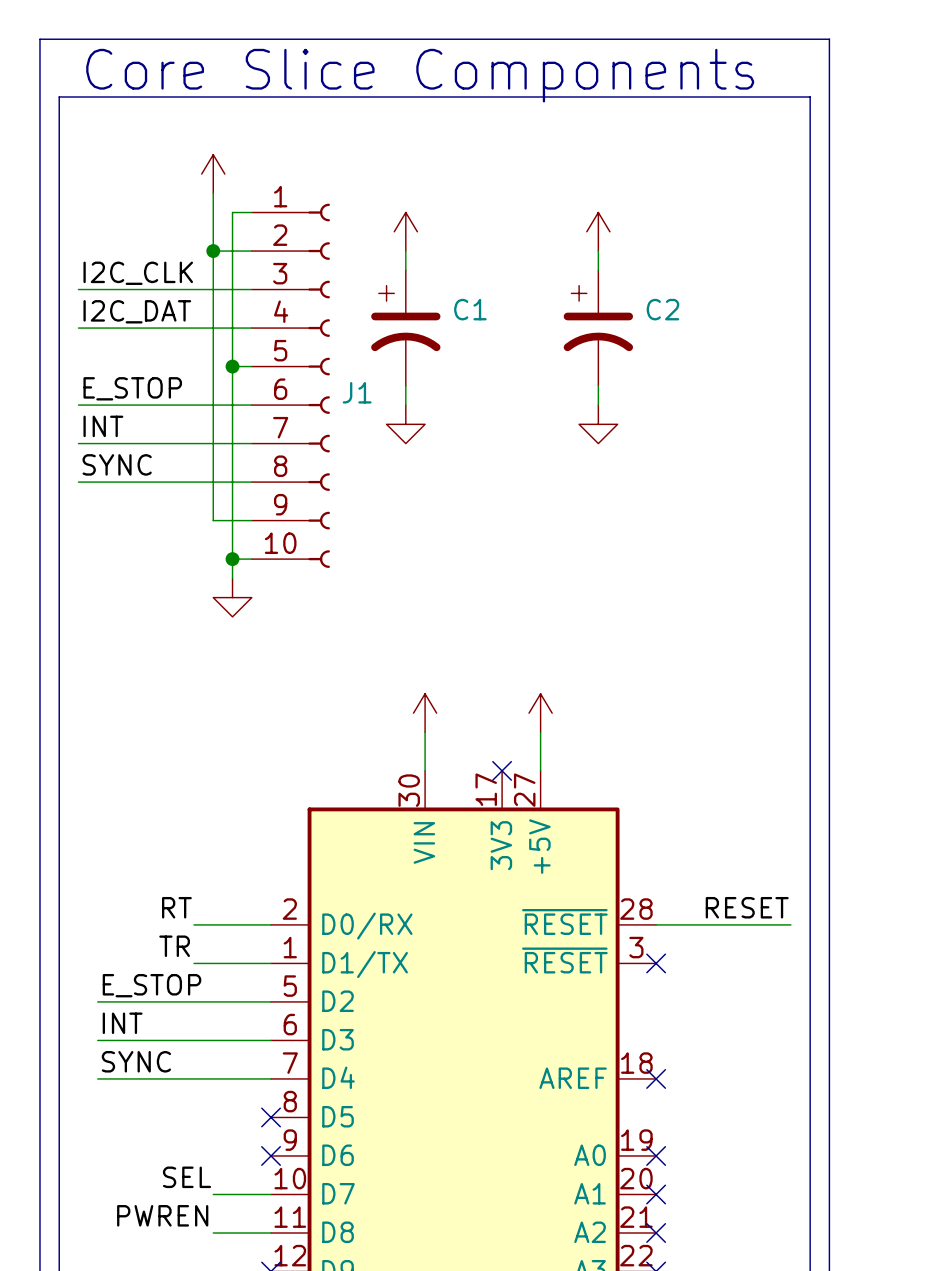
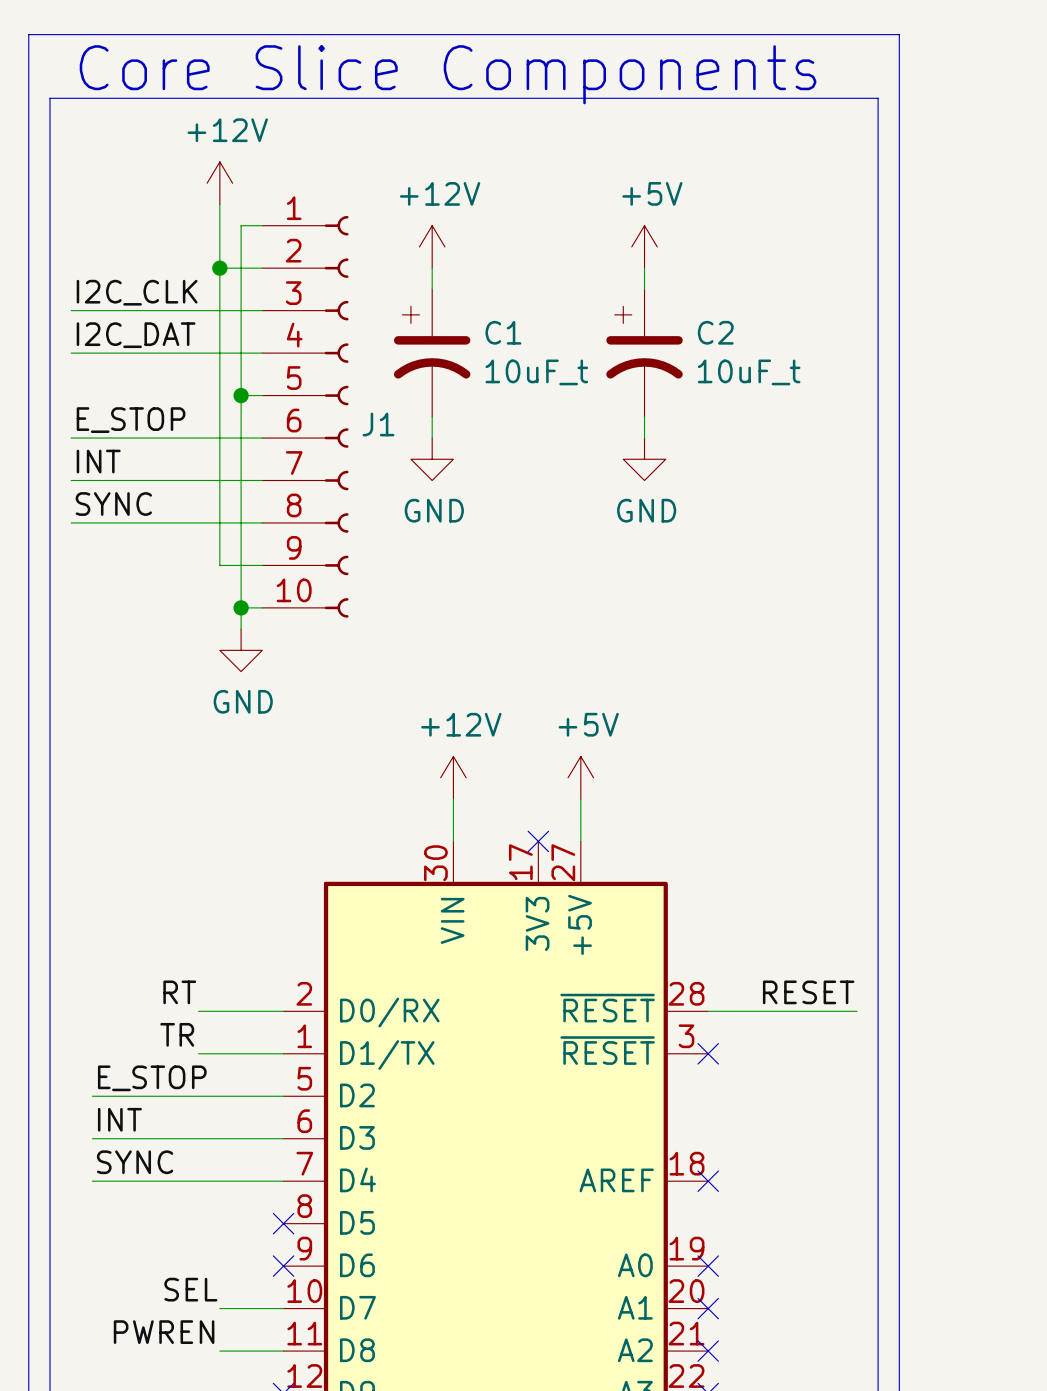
power symbol text: none -> +12V (227, 130)
power symbol text: none -> +12V (440, 193)
power symbol text: none -> +5V (652, 193)
C1 value: none -> 10uF_t (536, 372)
C2 value: none -> 10uF_t (749, 372)
power symbol text: none -> GND (434, 510)
power symbol text: none -> GND (646, 510)
power symbol text: none -> GND (243, 701)
power symbol text: none -> +12V (461, 724)
power symbol text: none -> +5V (588, 724)

